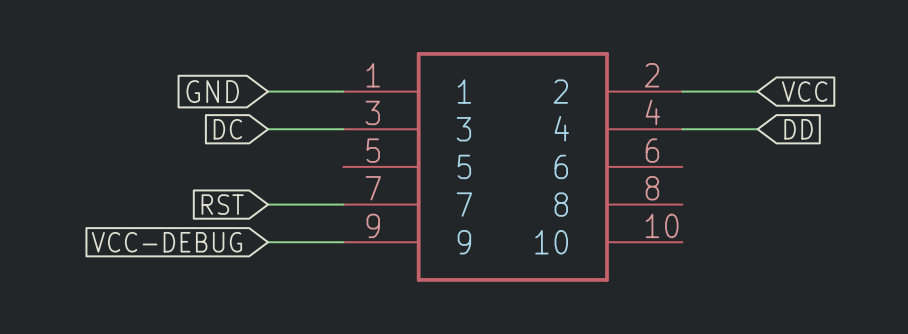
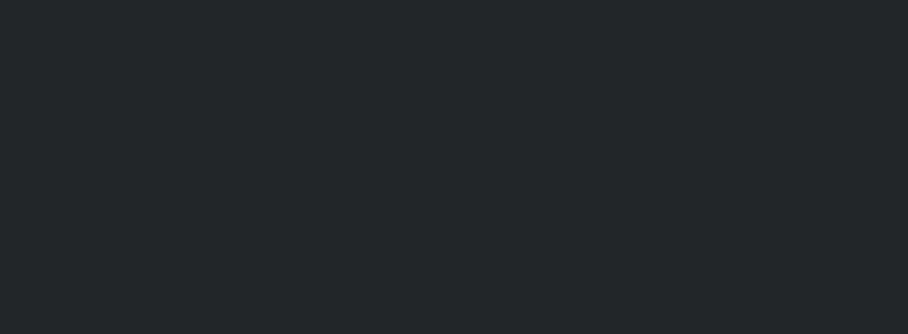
global label: GND (212, 91) -> none
wire: (268, 91) (343, 91) -> none
wire: (682, 91) (757, 91) -> none
global label: VCC (804, 91) -> none
global label: DC (227, 129) -> none
wire: (268, 129) (343, 129) -> none
wire: (682, 129) (757, 129) -> none
global label: DD (798, 129) -> none
part: (512, 166) -> none
global label: RST (222, 204) -> none
wire: (268, 204) (343, 204) -> none
global label: VCC-DEBUG (166, 242) -> none
wire: (268, 242) (343, 242) -> none

